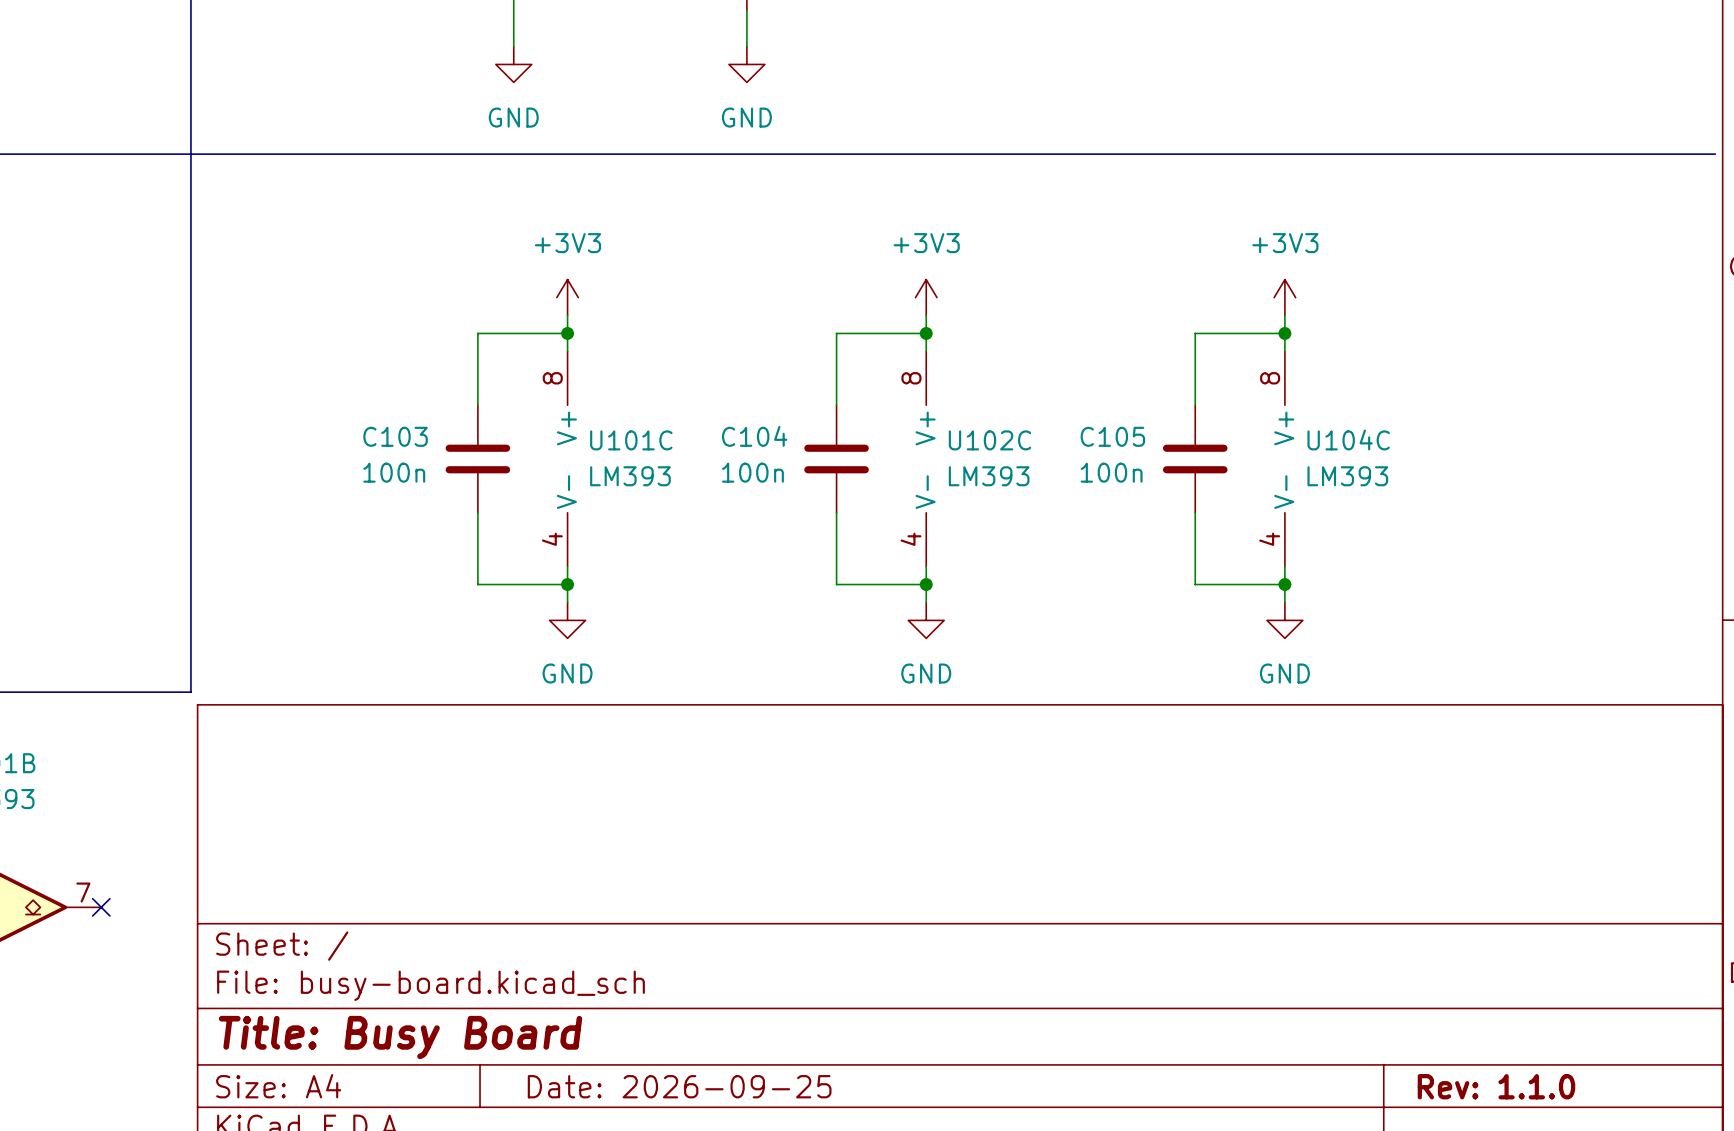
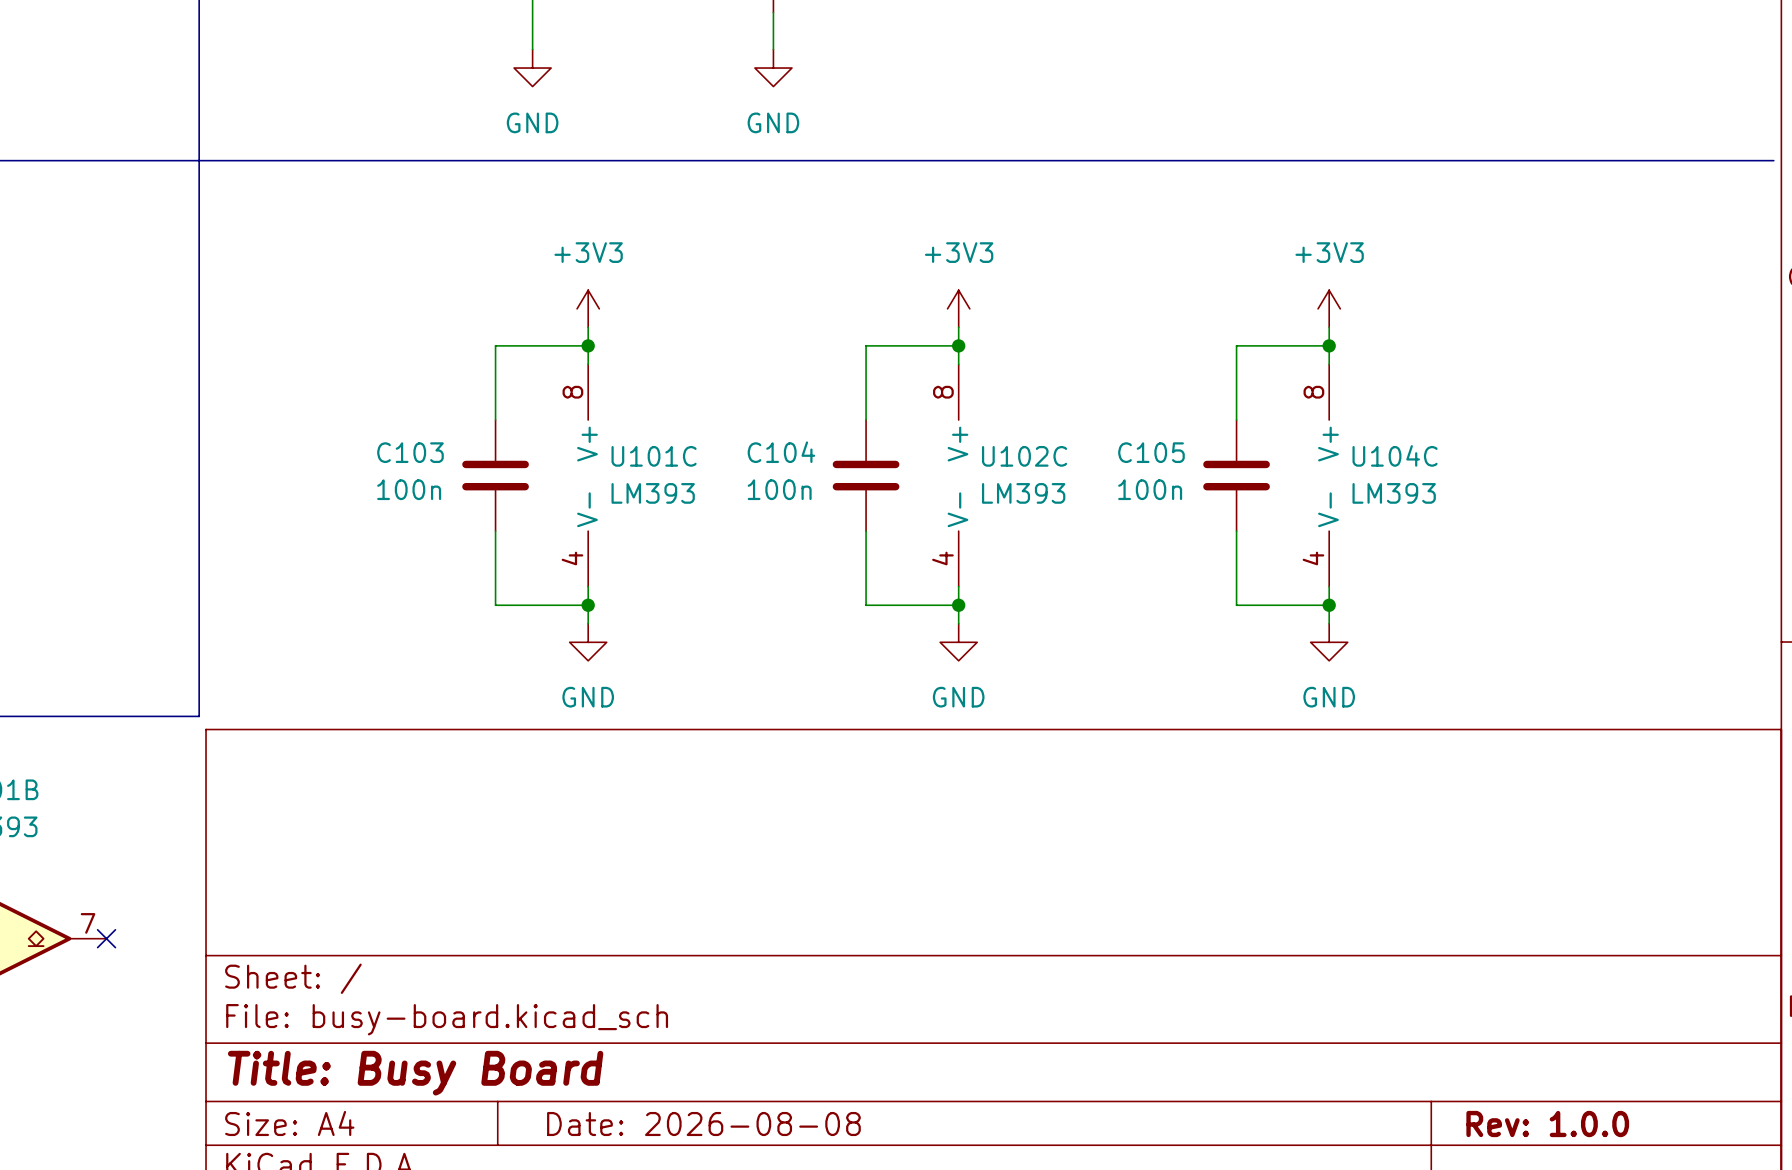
title block: Date: 2026-09-25 (679, 1086) -> Date: 2026-08-08 (703, 1124)
title block: Rev: 1.1.0 (1496, 1086) -> Rev: 1.0.0 (1547, 1124)

